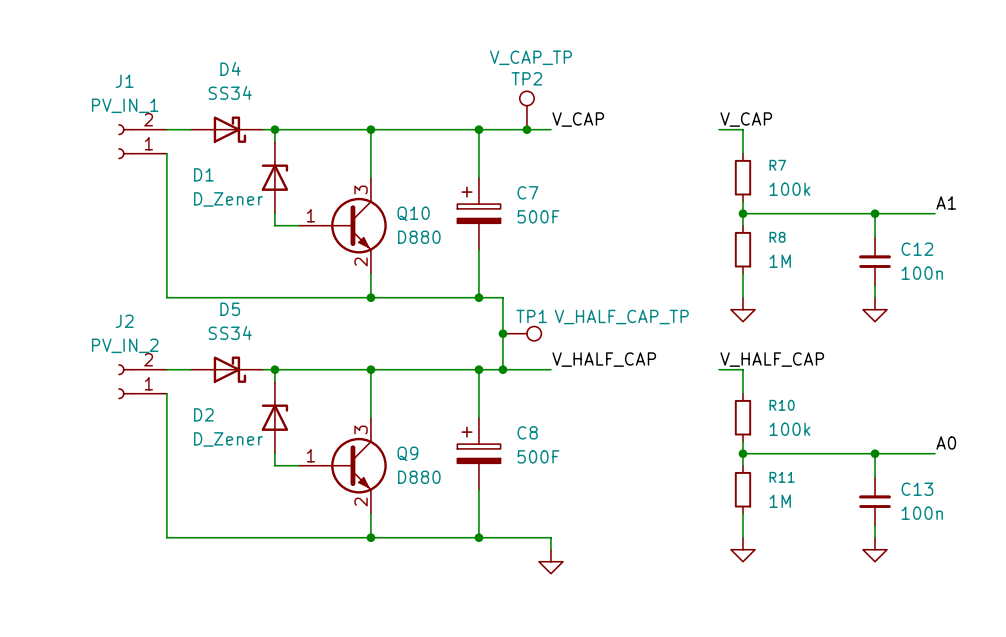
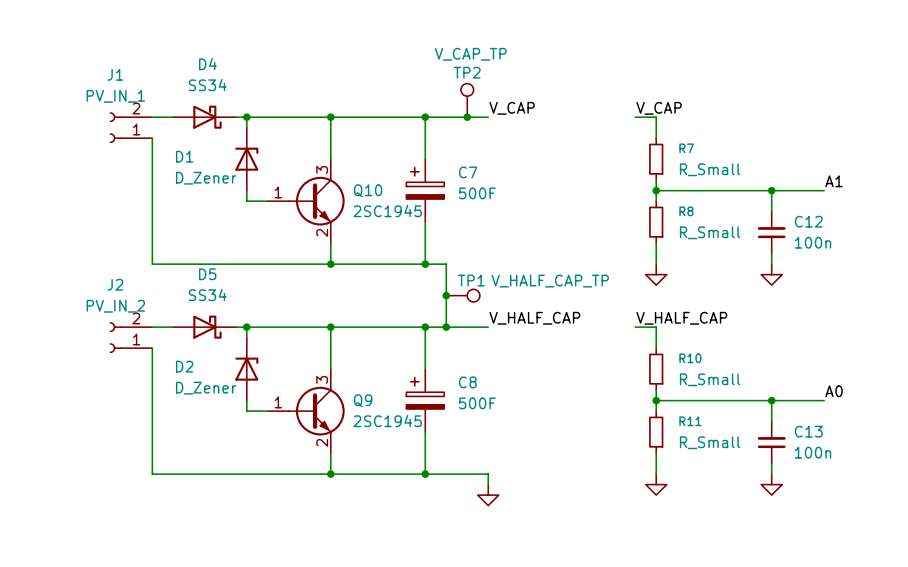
R7 value: 100k (789, 189) -> R_Small (710, 169)
Q10 value: D880 (419, 237) -> 2SC1945 (387, 211)
R8 value: 1M (780, 261) -> R_Small (710, 232)
R10 value: 100k (789, 429) -> R_Small (710, 379)
Q9 value: D880 (419, 477) -> 2SC1945 (387, 420)
R11 value: 1M (780, 501) -> R_Small (710, 442)

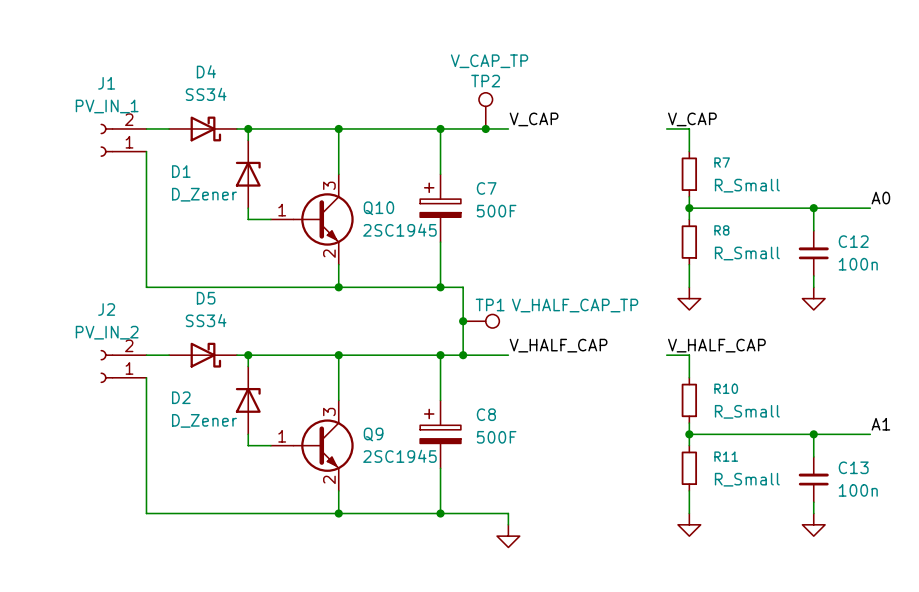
label: A1 (834, 181) -> A0 (880, 198)
label: A0 (834, 391) -> A1 (880, 424)

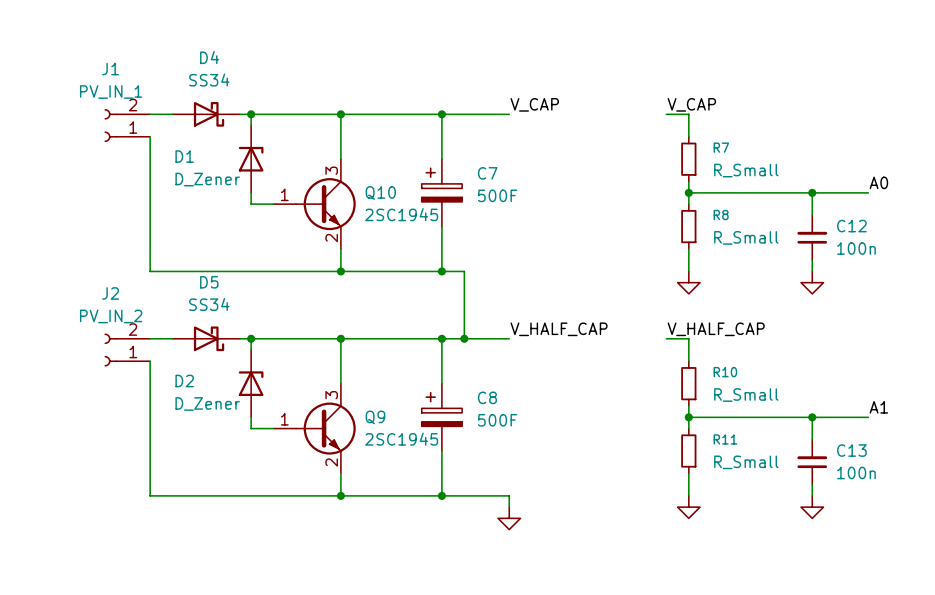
TP2: V_CAP_TP (485, 110) -> none
junction: (485, 128) -> none
junction: (463, 321) -> none
TP1: V_HALF_CAP_TP (481, 321) -> none

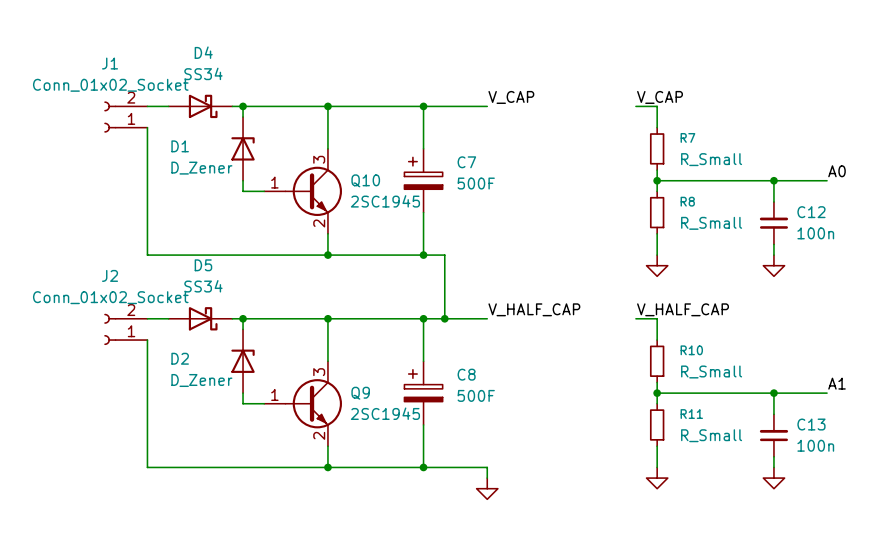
J1 value: PV_IN_1 (111, 92) -> Conn_01x02_Socket (110, 85)
J2 value: PV_IN_2 (111, 316) -> Conn_01x02_Socket (110, 297)

